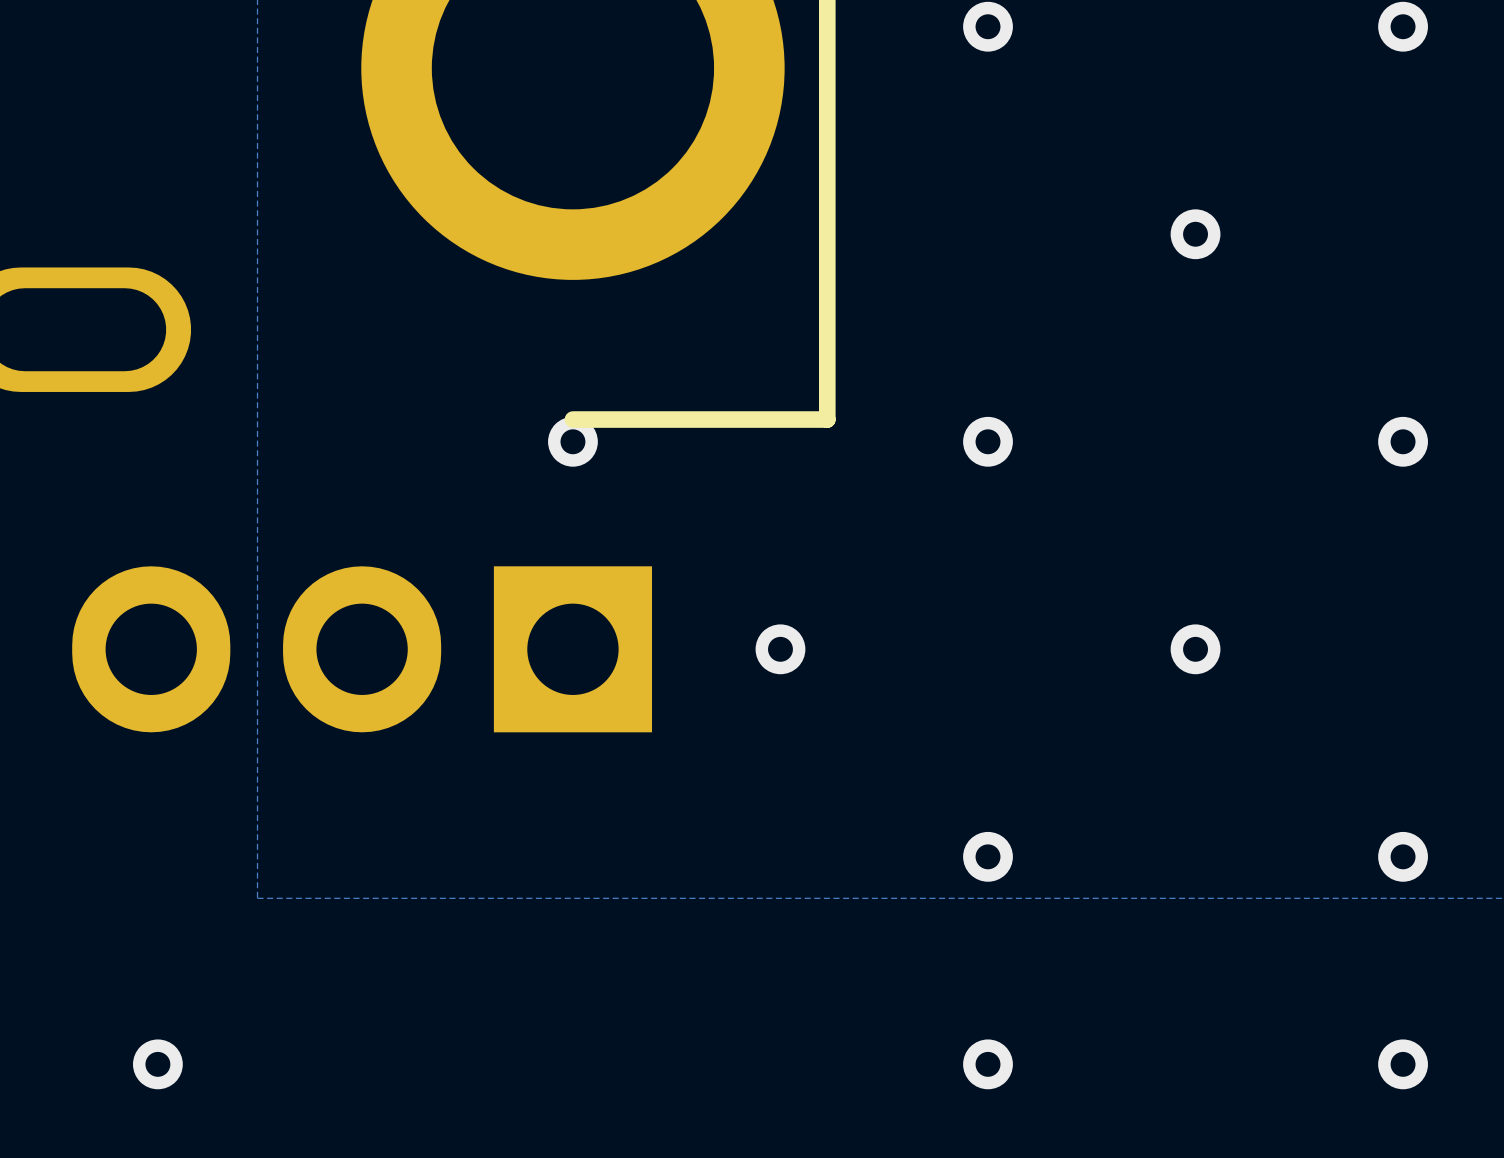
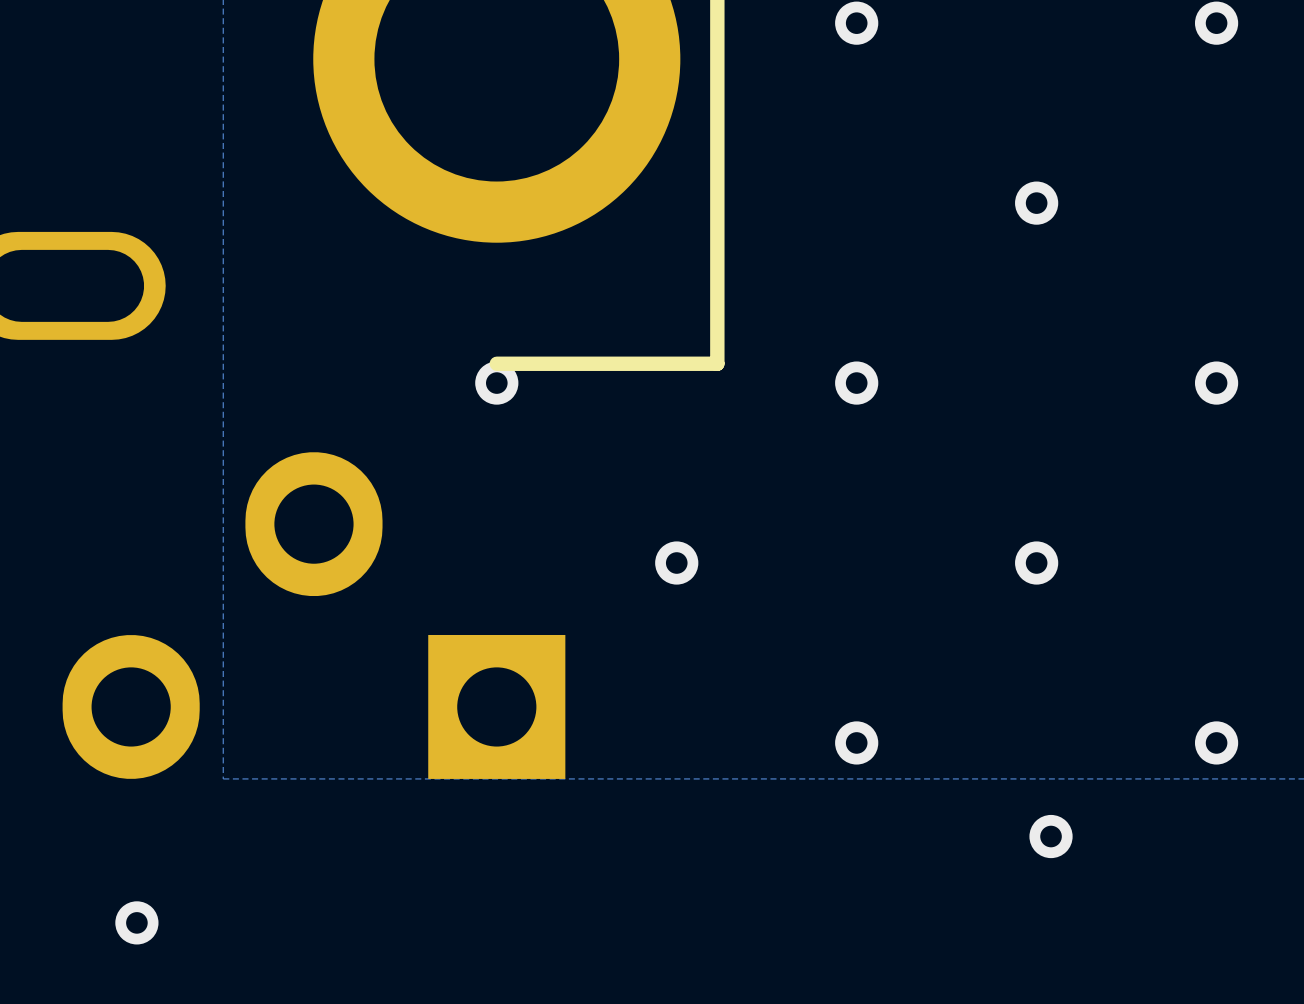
part footprint: [72, 566, 653, 733] -> [62, 452, 566, 779]
via: none -> (1051, 836)
via: (988, 1064) -> none
via: (1403, 1064) -> none

